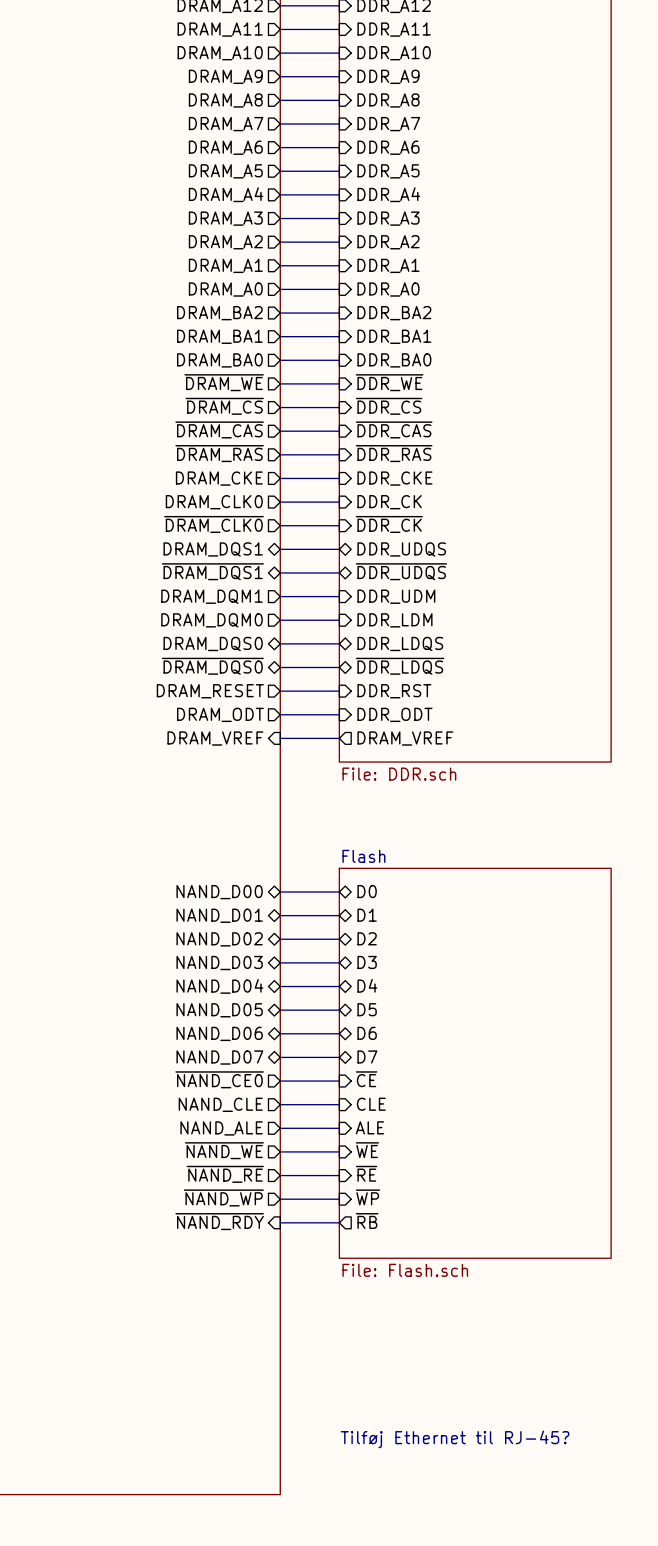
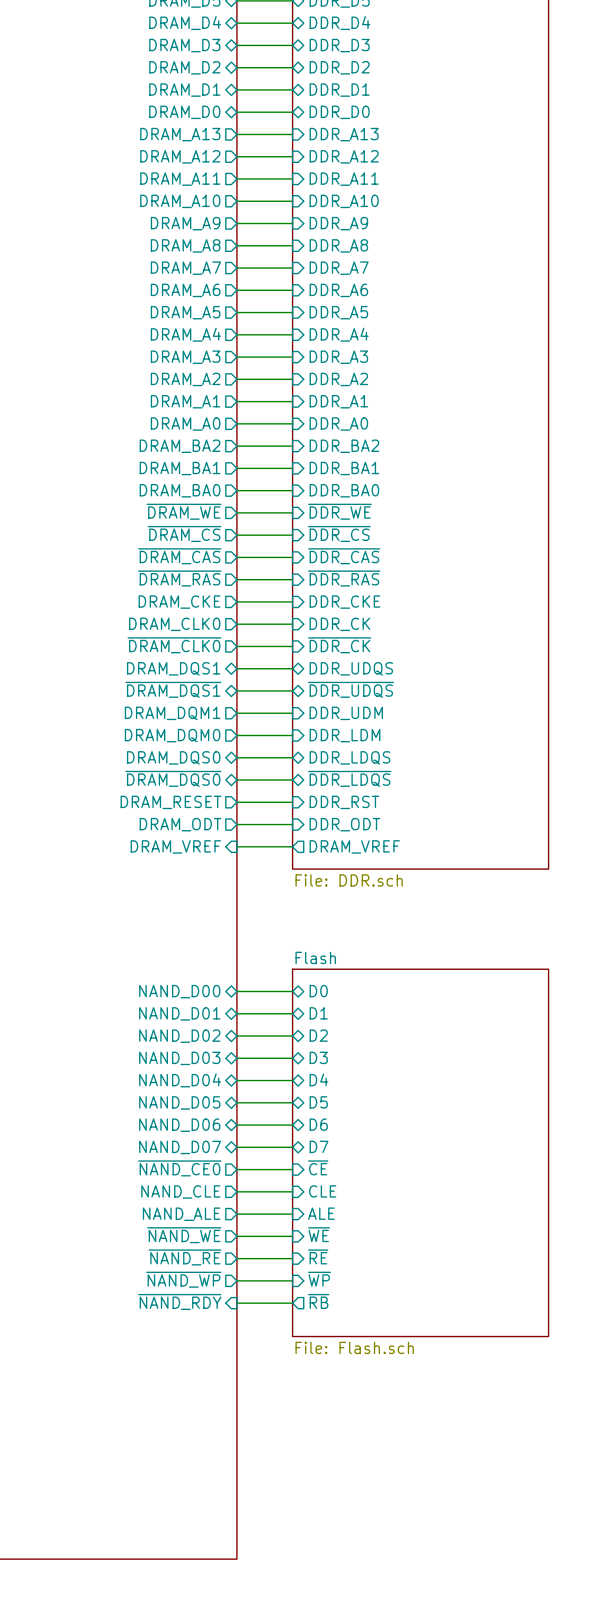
text: Tilføj Ethernet til RJ-45? (455, 1439) -> none

